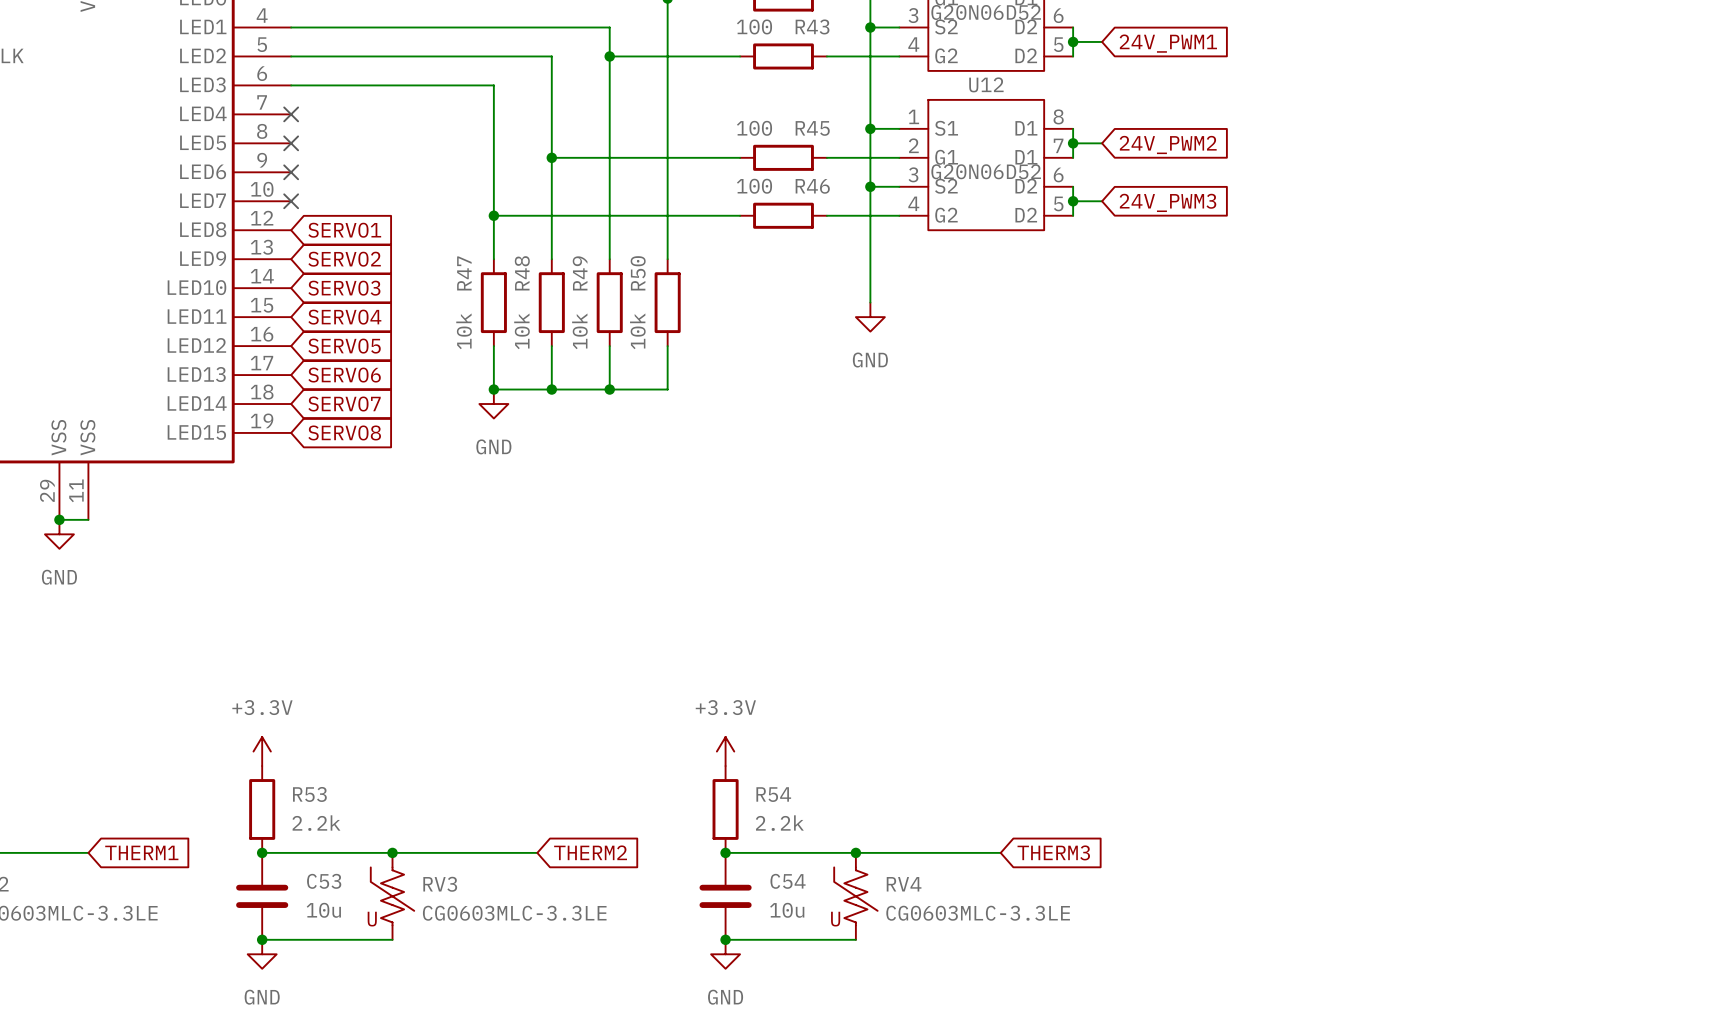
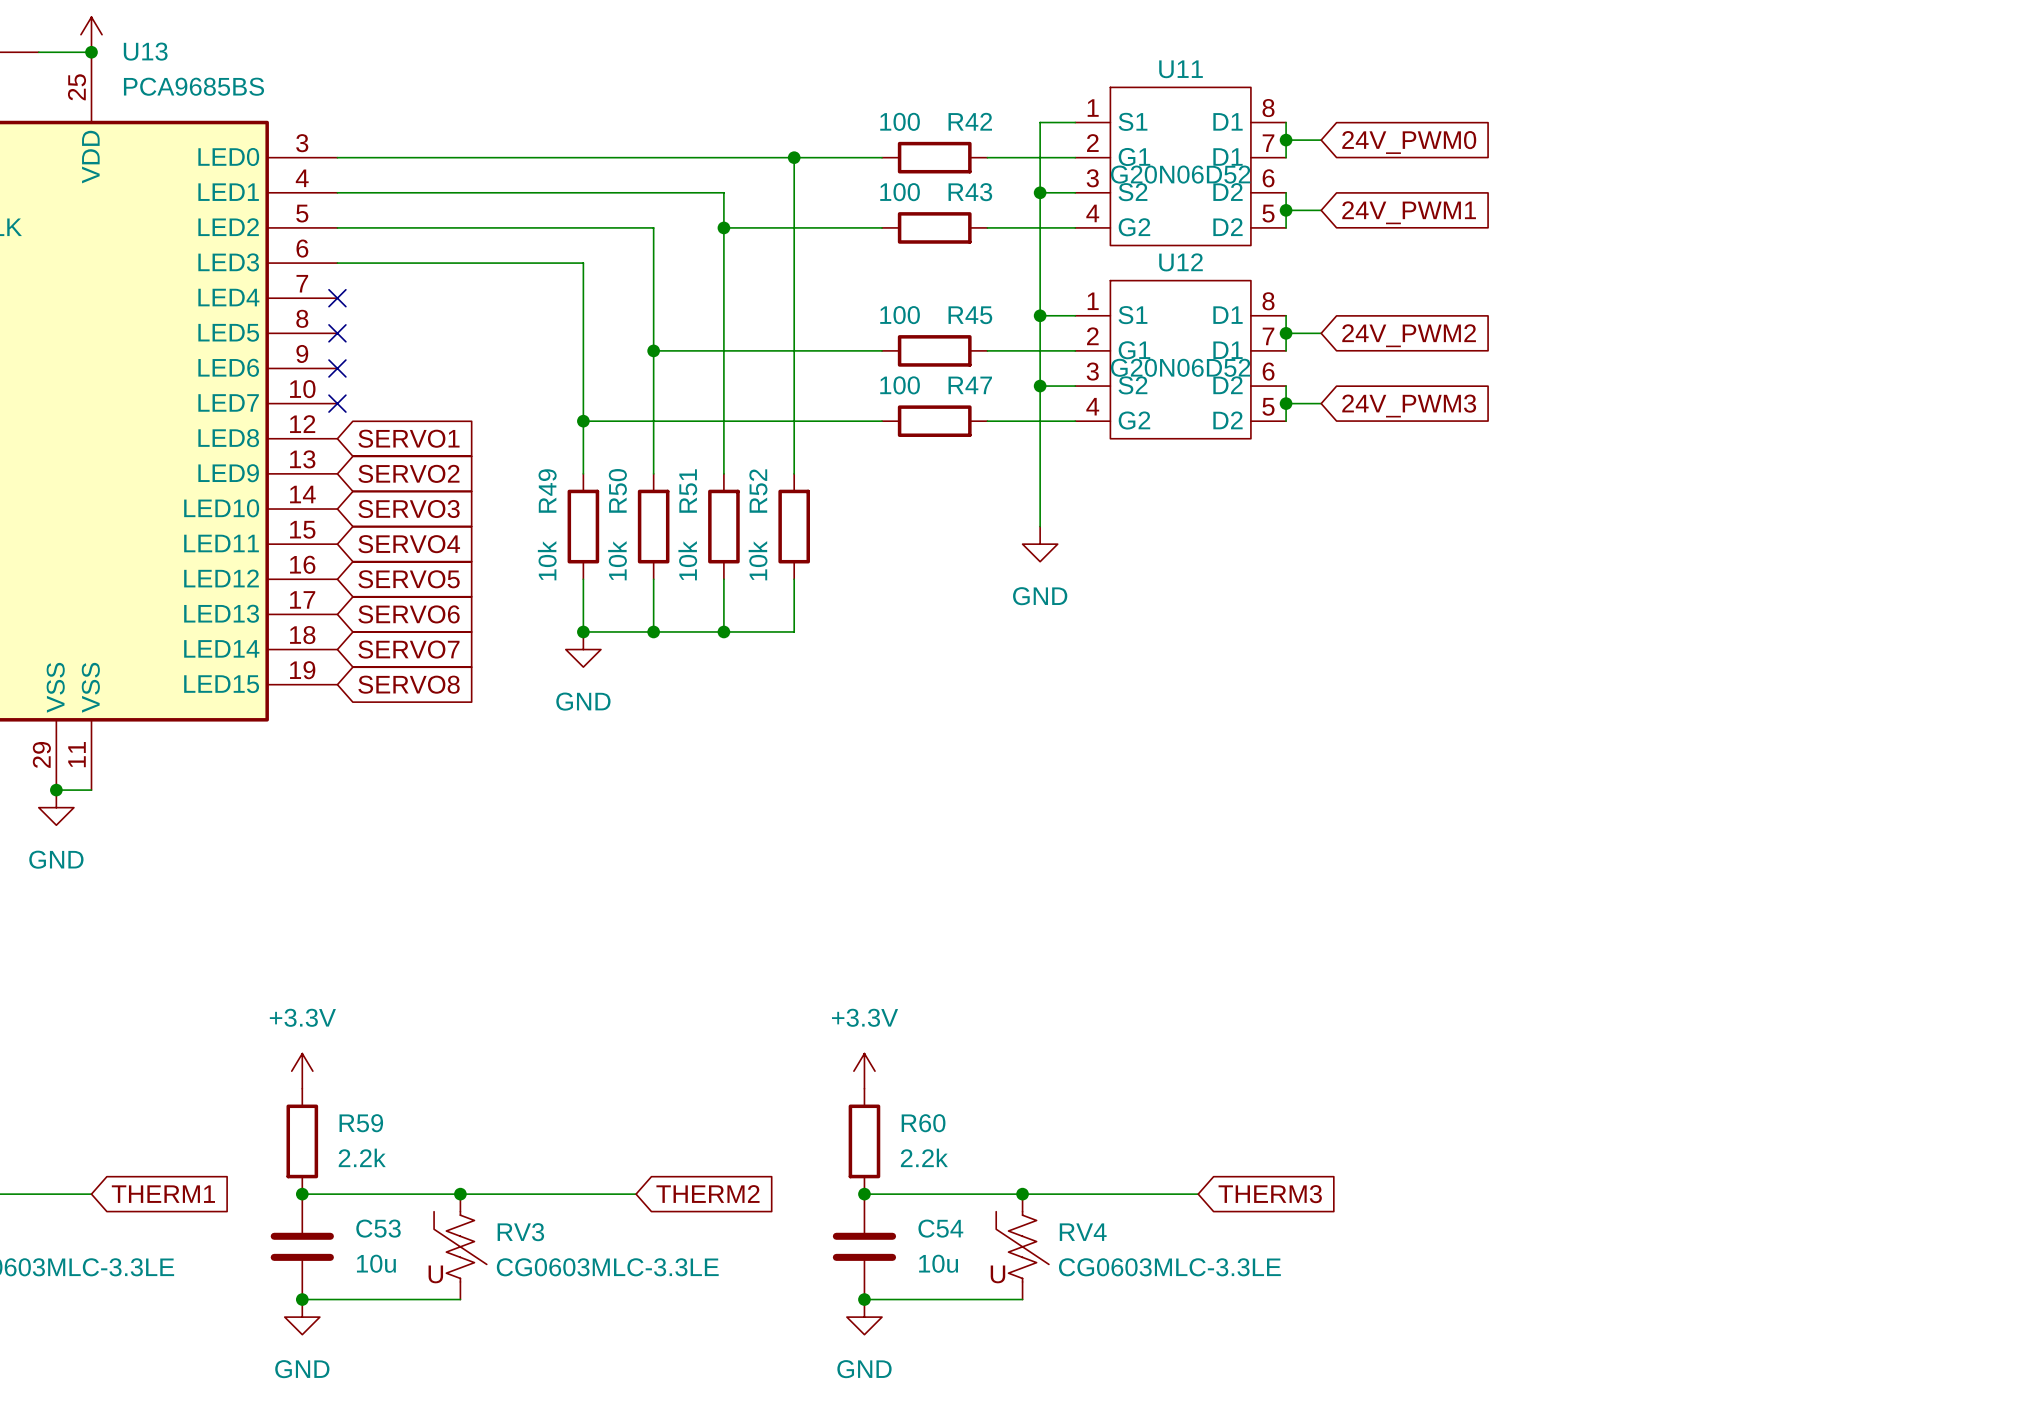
R46 name: R46 (812, 186) -> R47 (970, 385)
R47 name: R47 (464, 273) -> R49 (547, 491)
R48 name: R48 (522, 273) -> R50 (617, 490)
R49 name: R49 (580, 273) -> R51 (688, 491)
R50 name: R50 (638, 273) -> R52 (758, 491)
R53 name: R53 (309, 794) -> R59 (361, 1123)
R54 name: R54 (773, 794) -> R60 (923, 1123)

